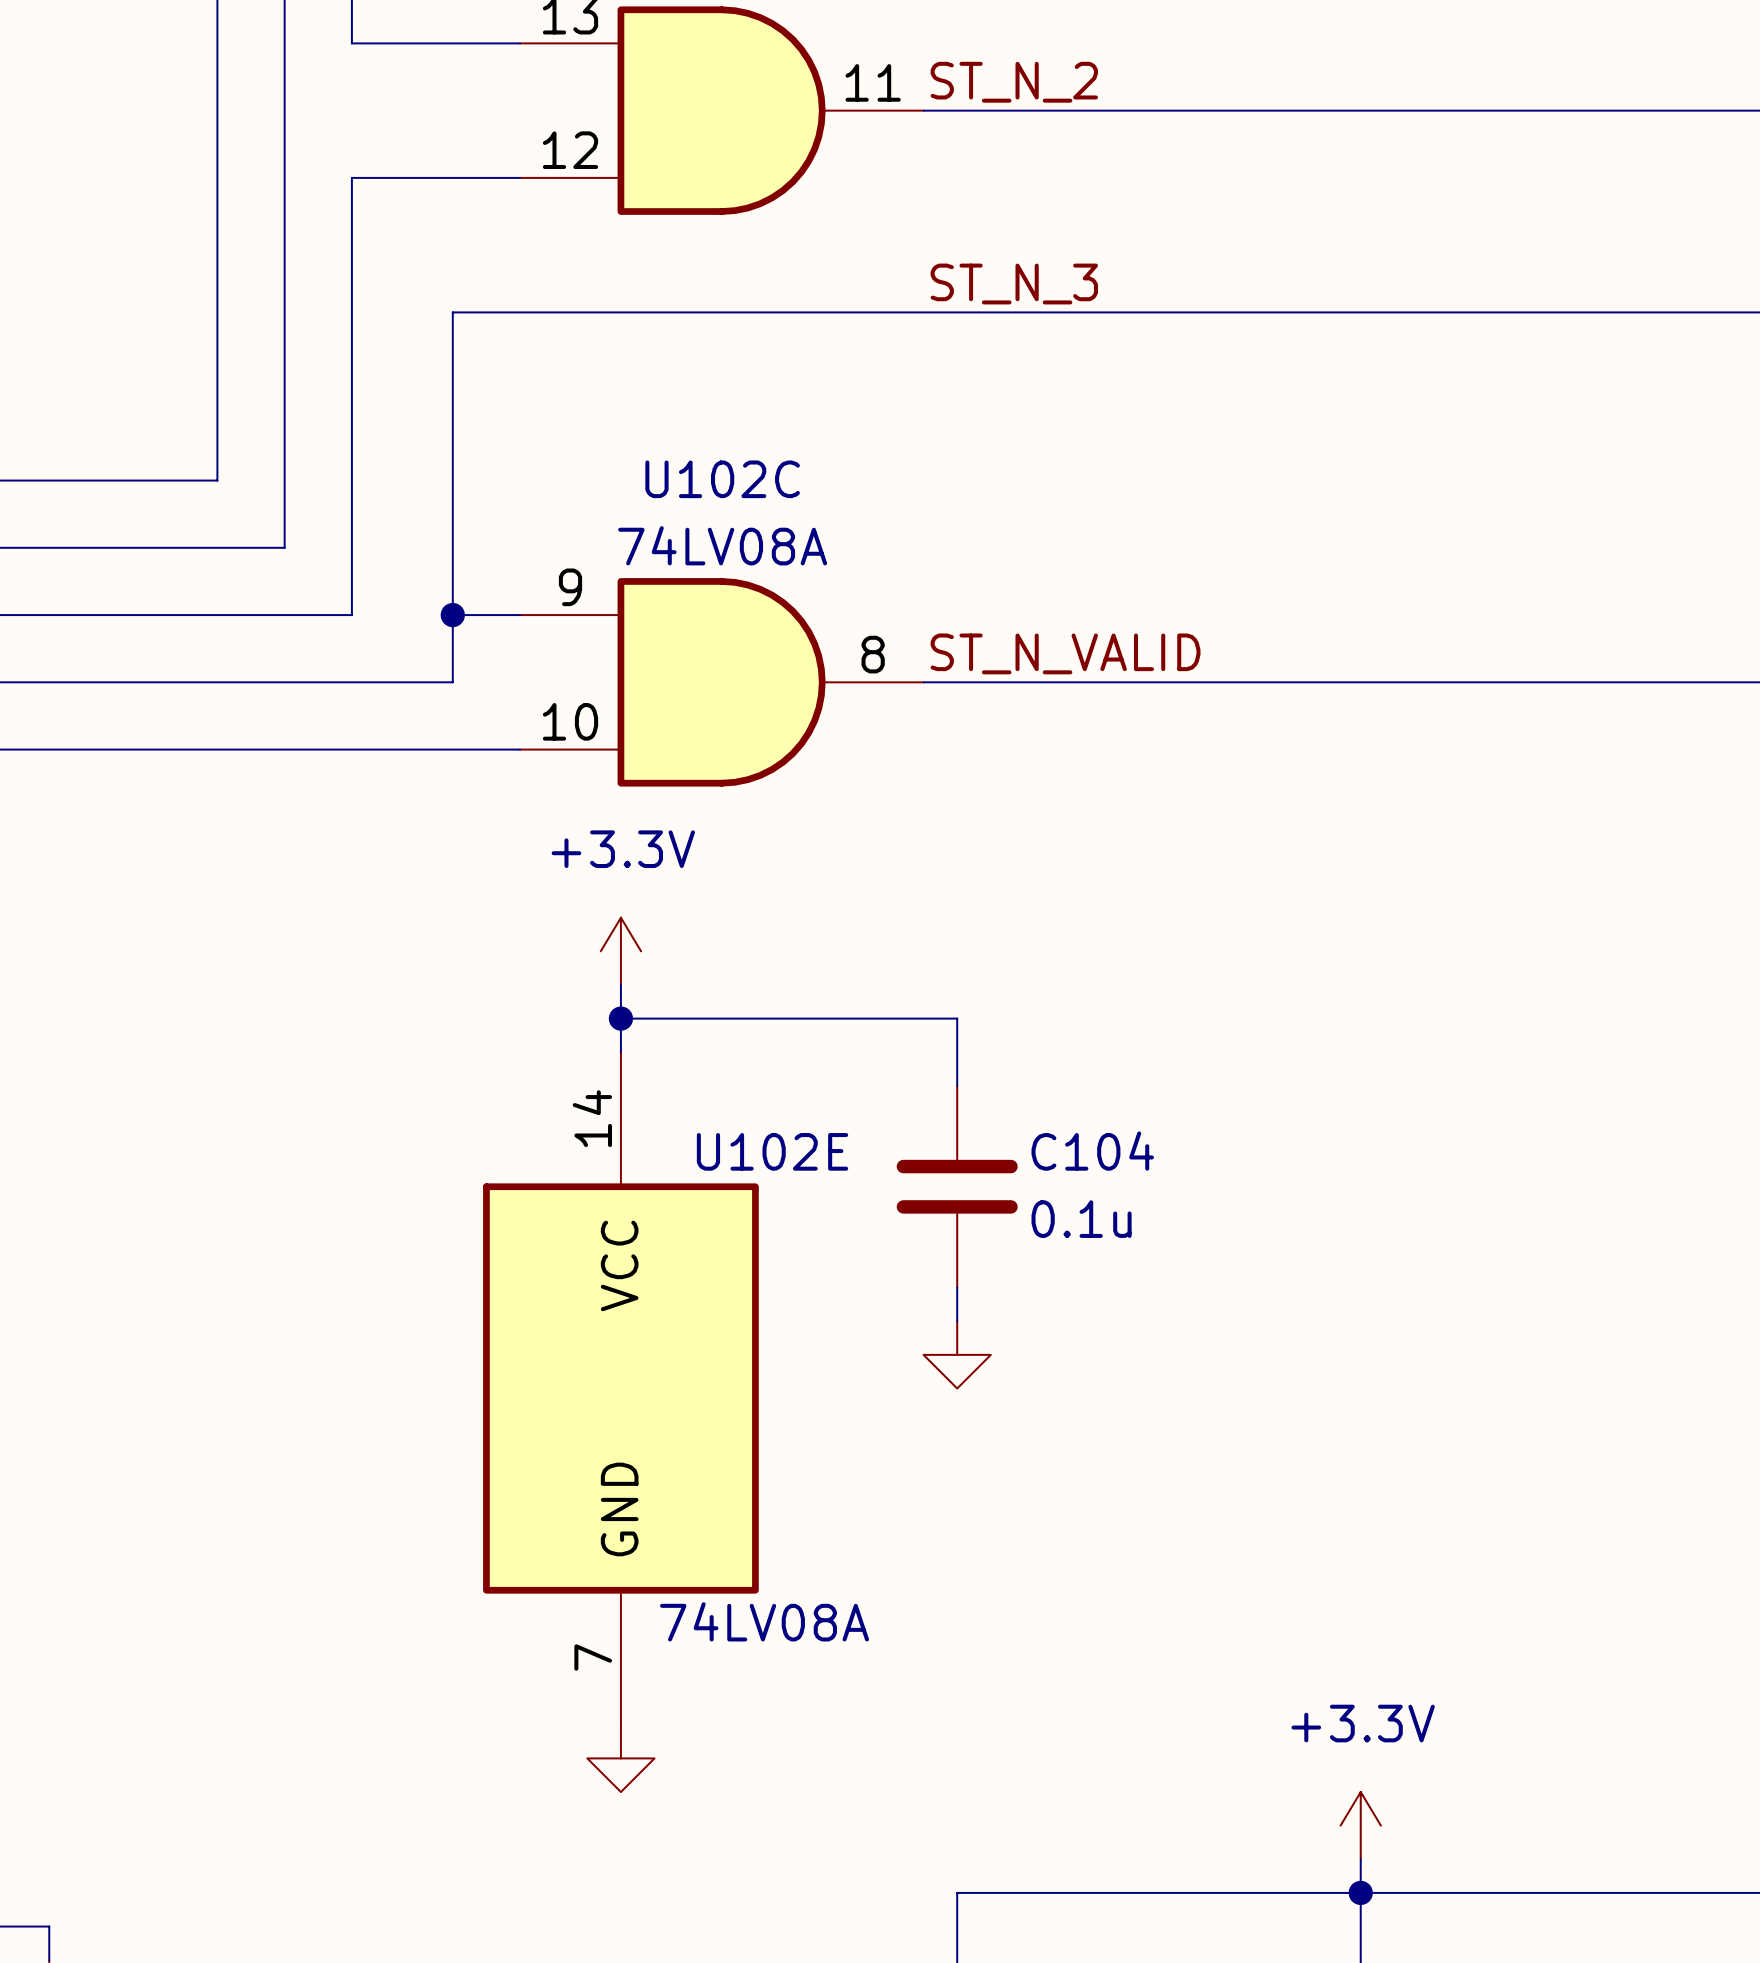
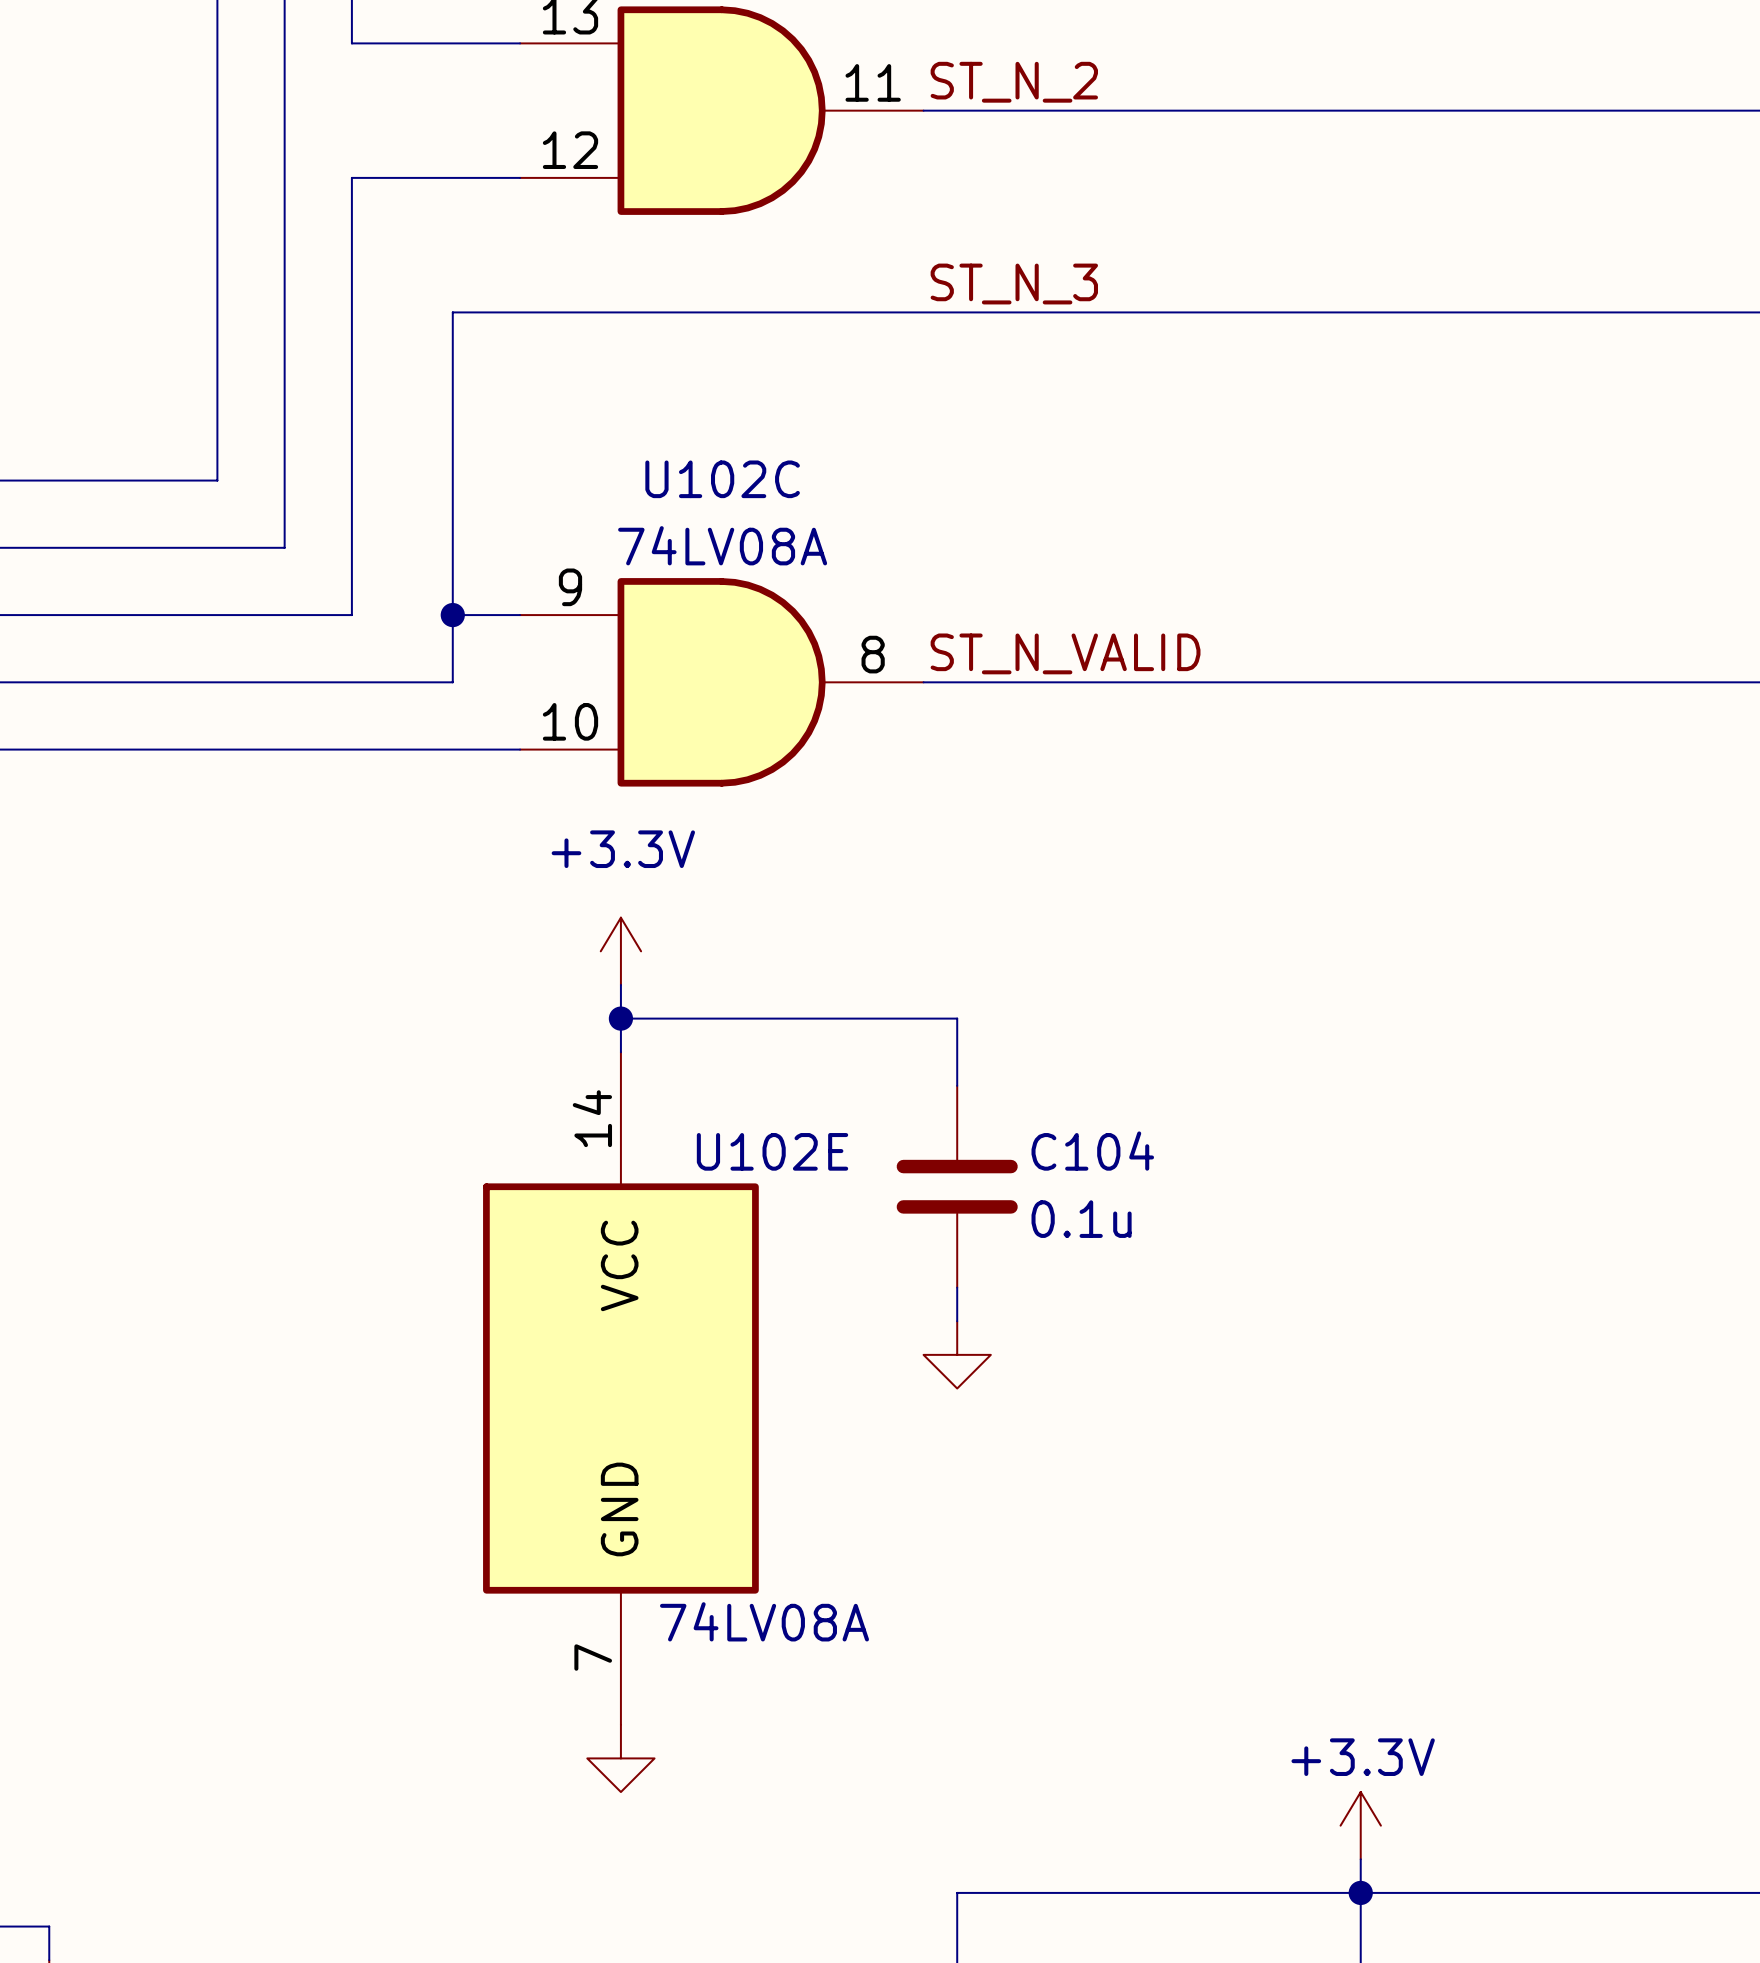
power symbol text position: +3.3V (1363, 1723) -> +3.3V (1363, 1757)

